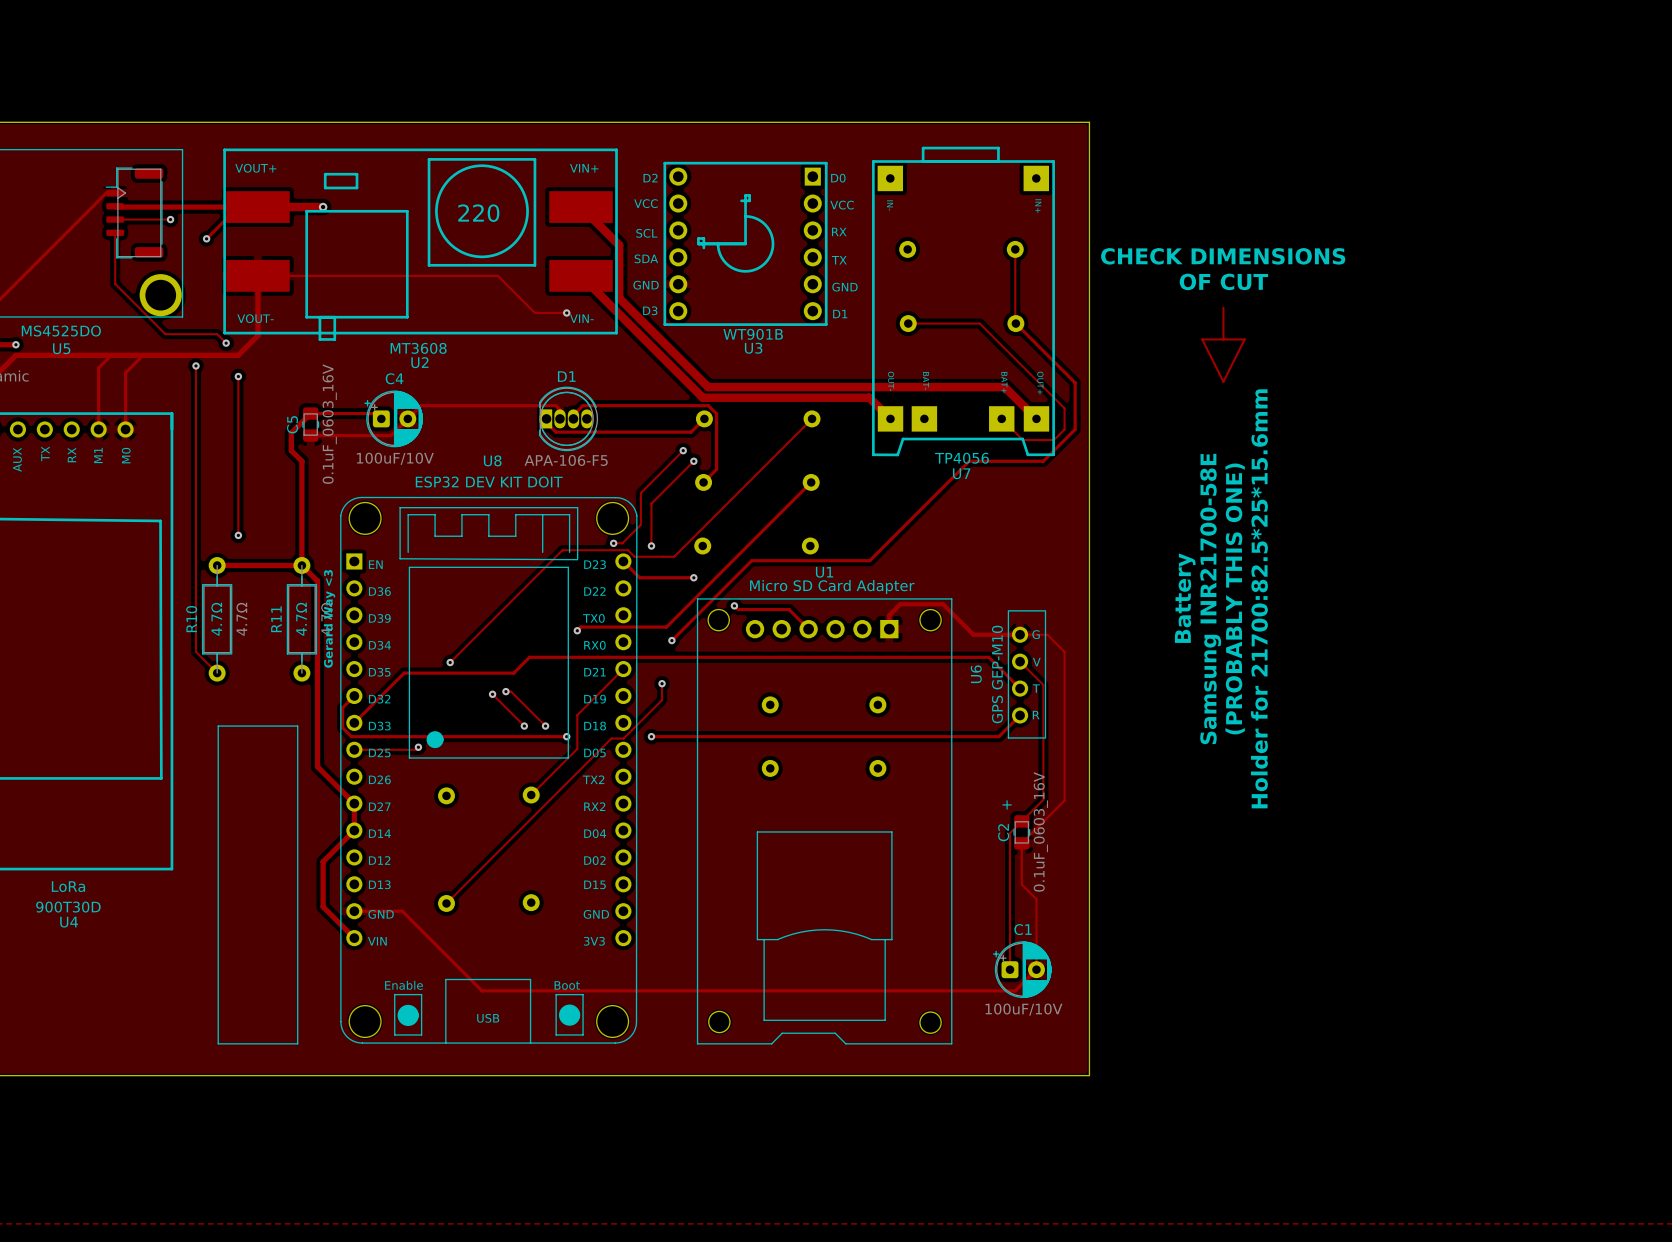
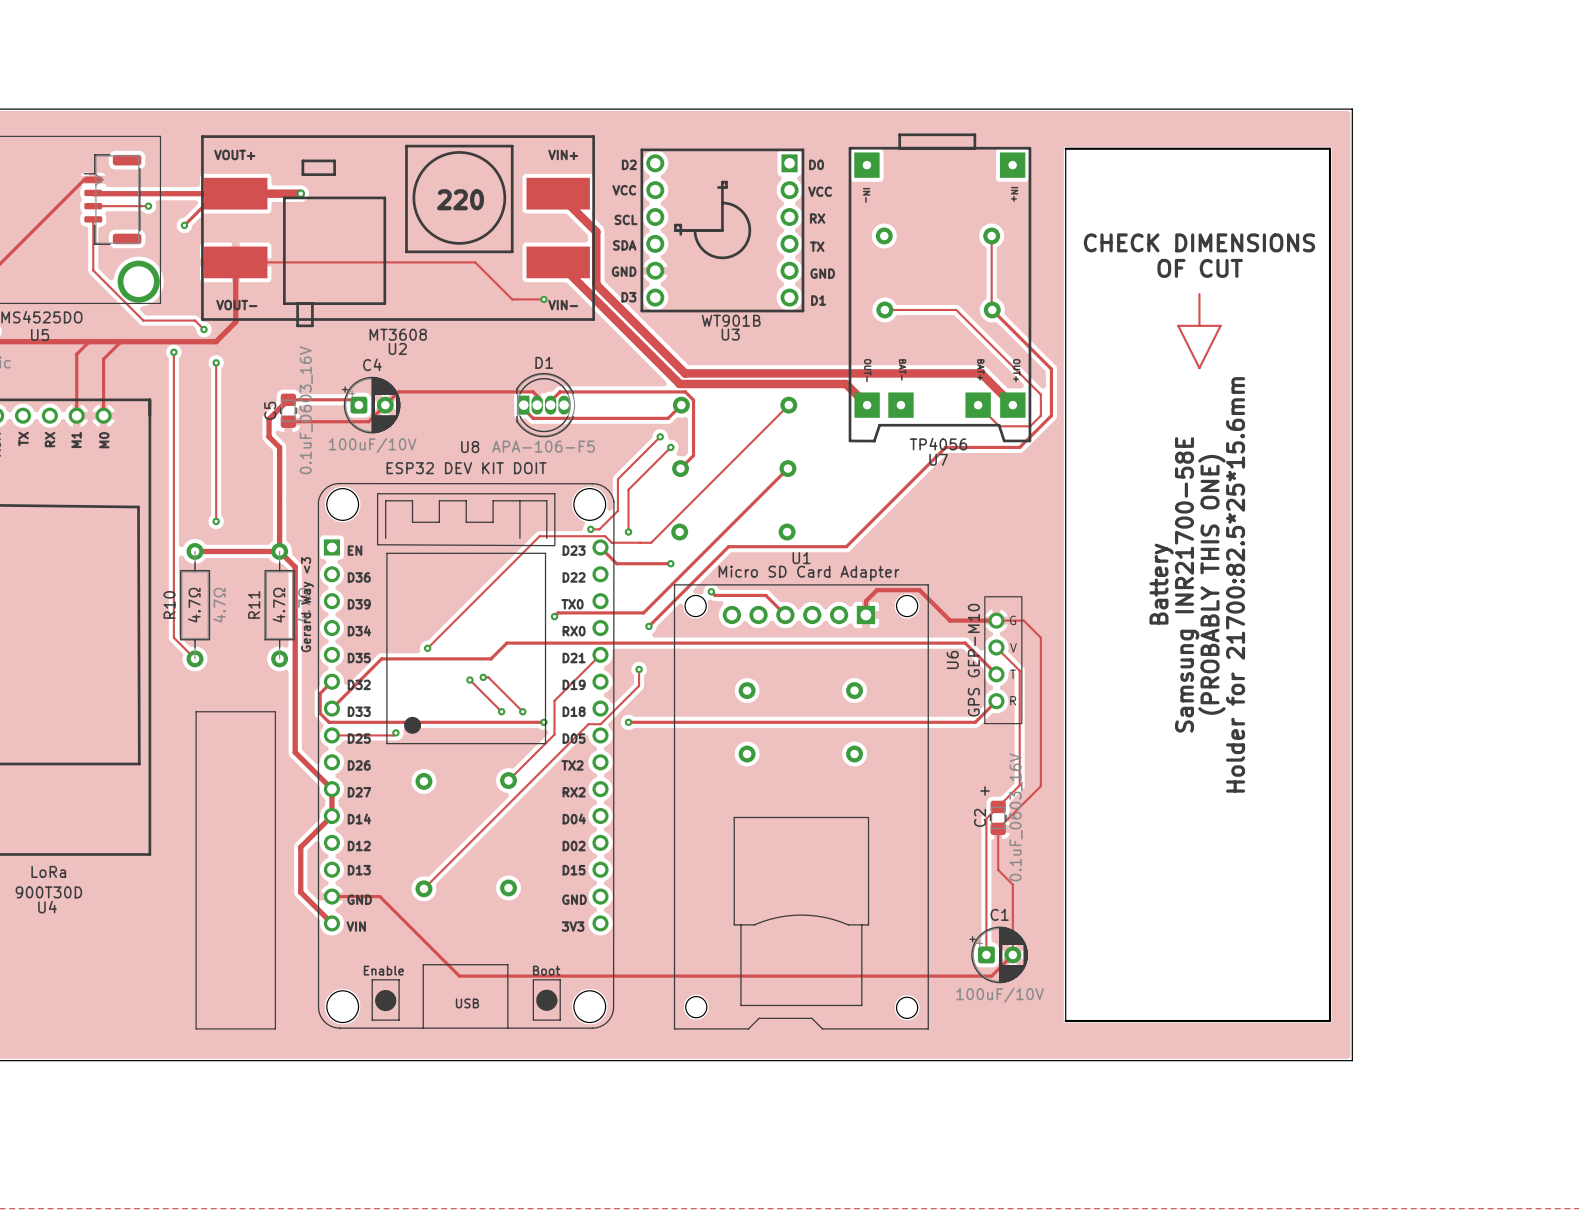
board edge: (1089, 122) (1089, 162) -> (1065, 109) (1352, 109) (1352, 1060) (1065, 1060)
board edge: (1089, 1035) (1089, 1075) -> (1065, 1021) (1330, 1021) (1330, 148) (1065, 148)

